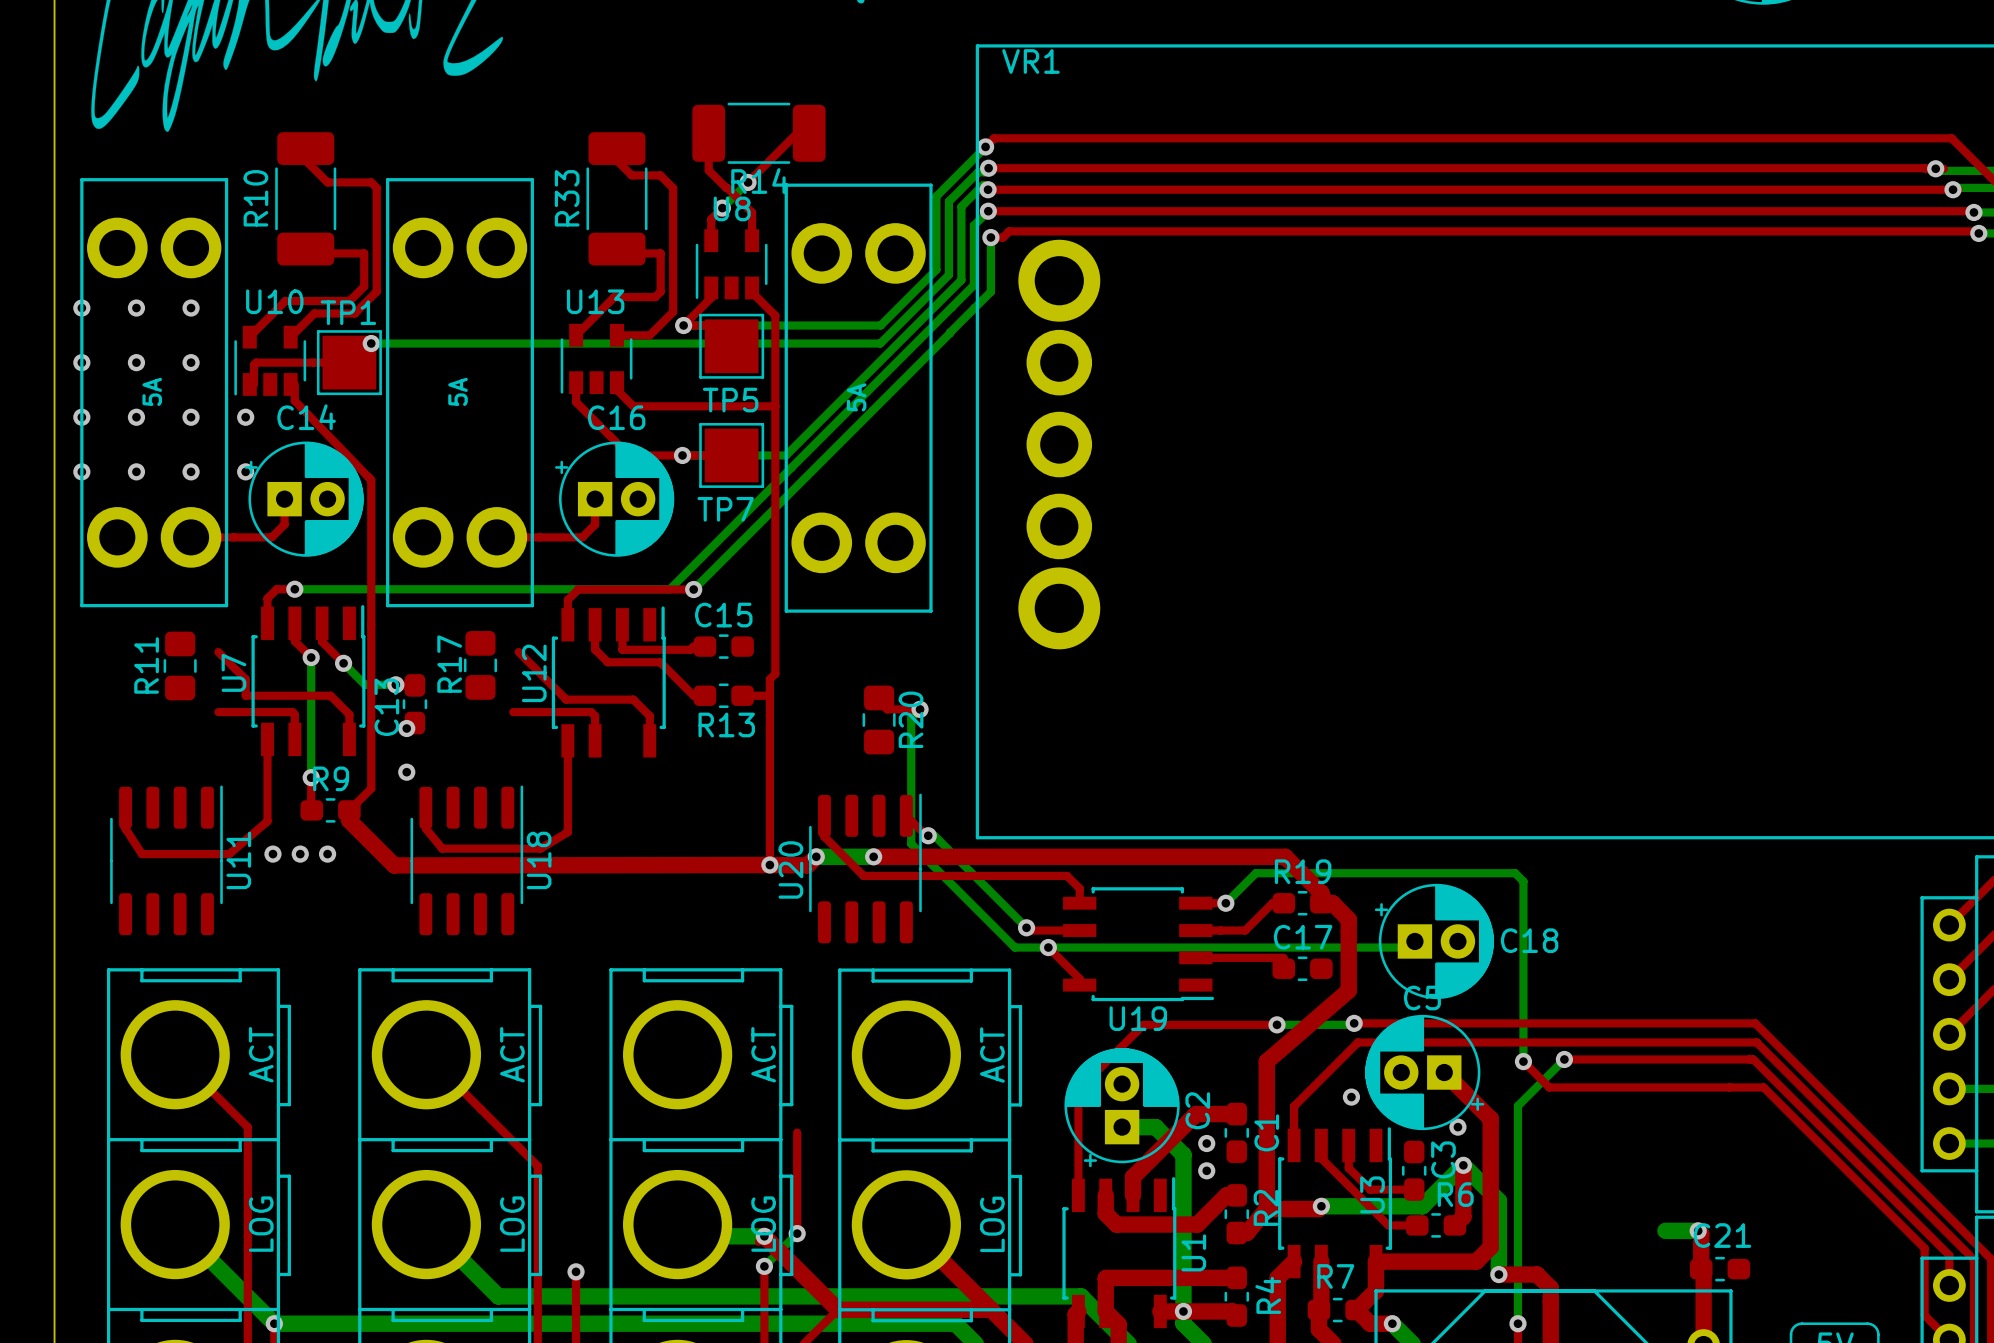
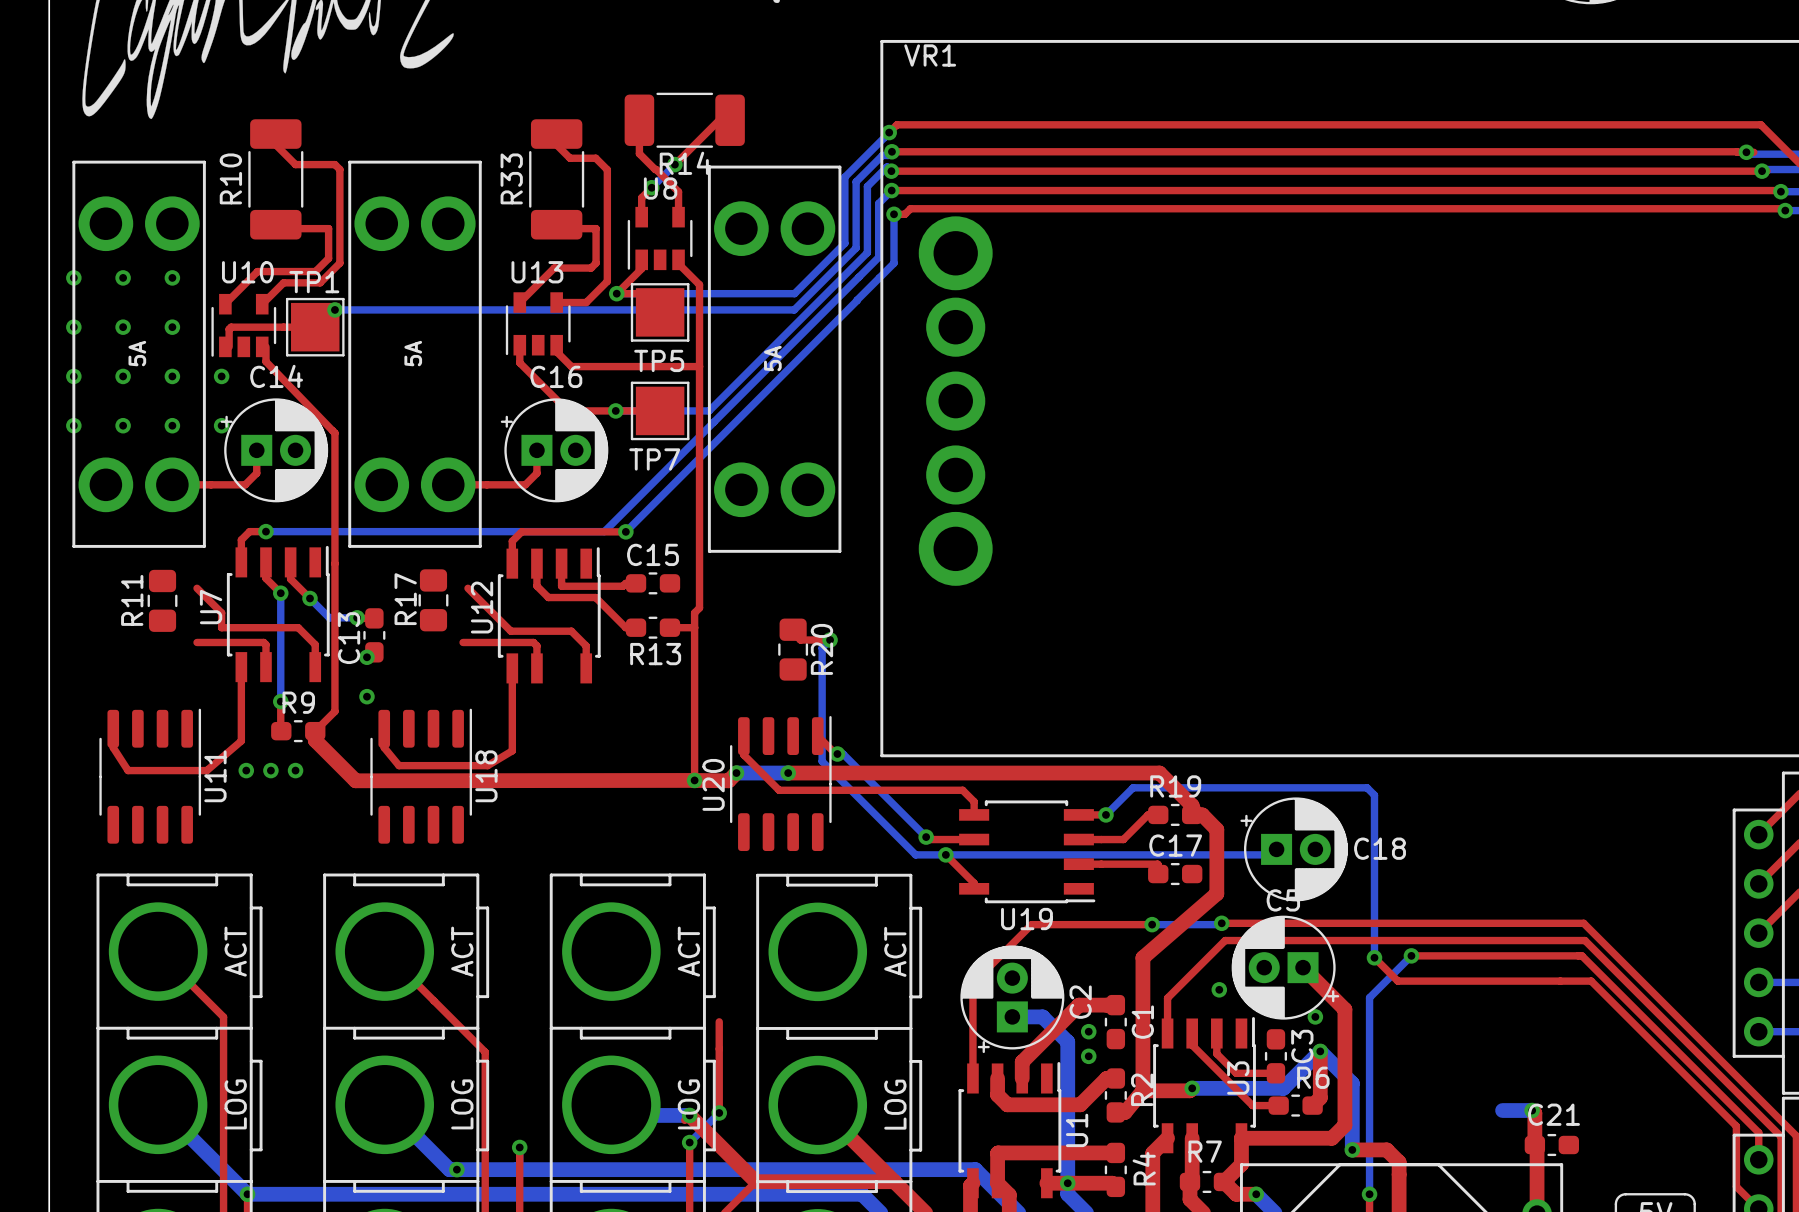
via: none -> (456, 1169)

